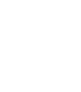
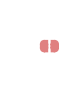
part: none -> (49, 46)

